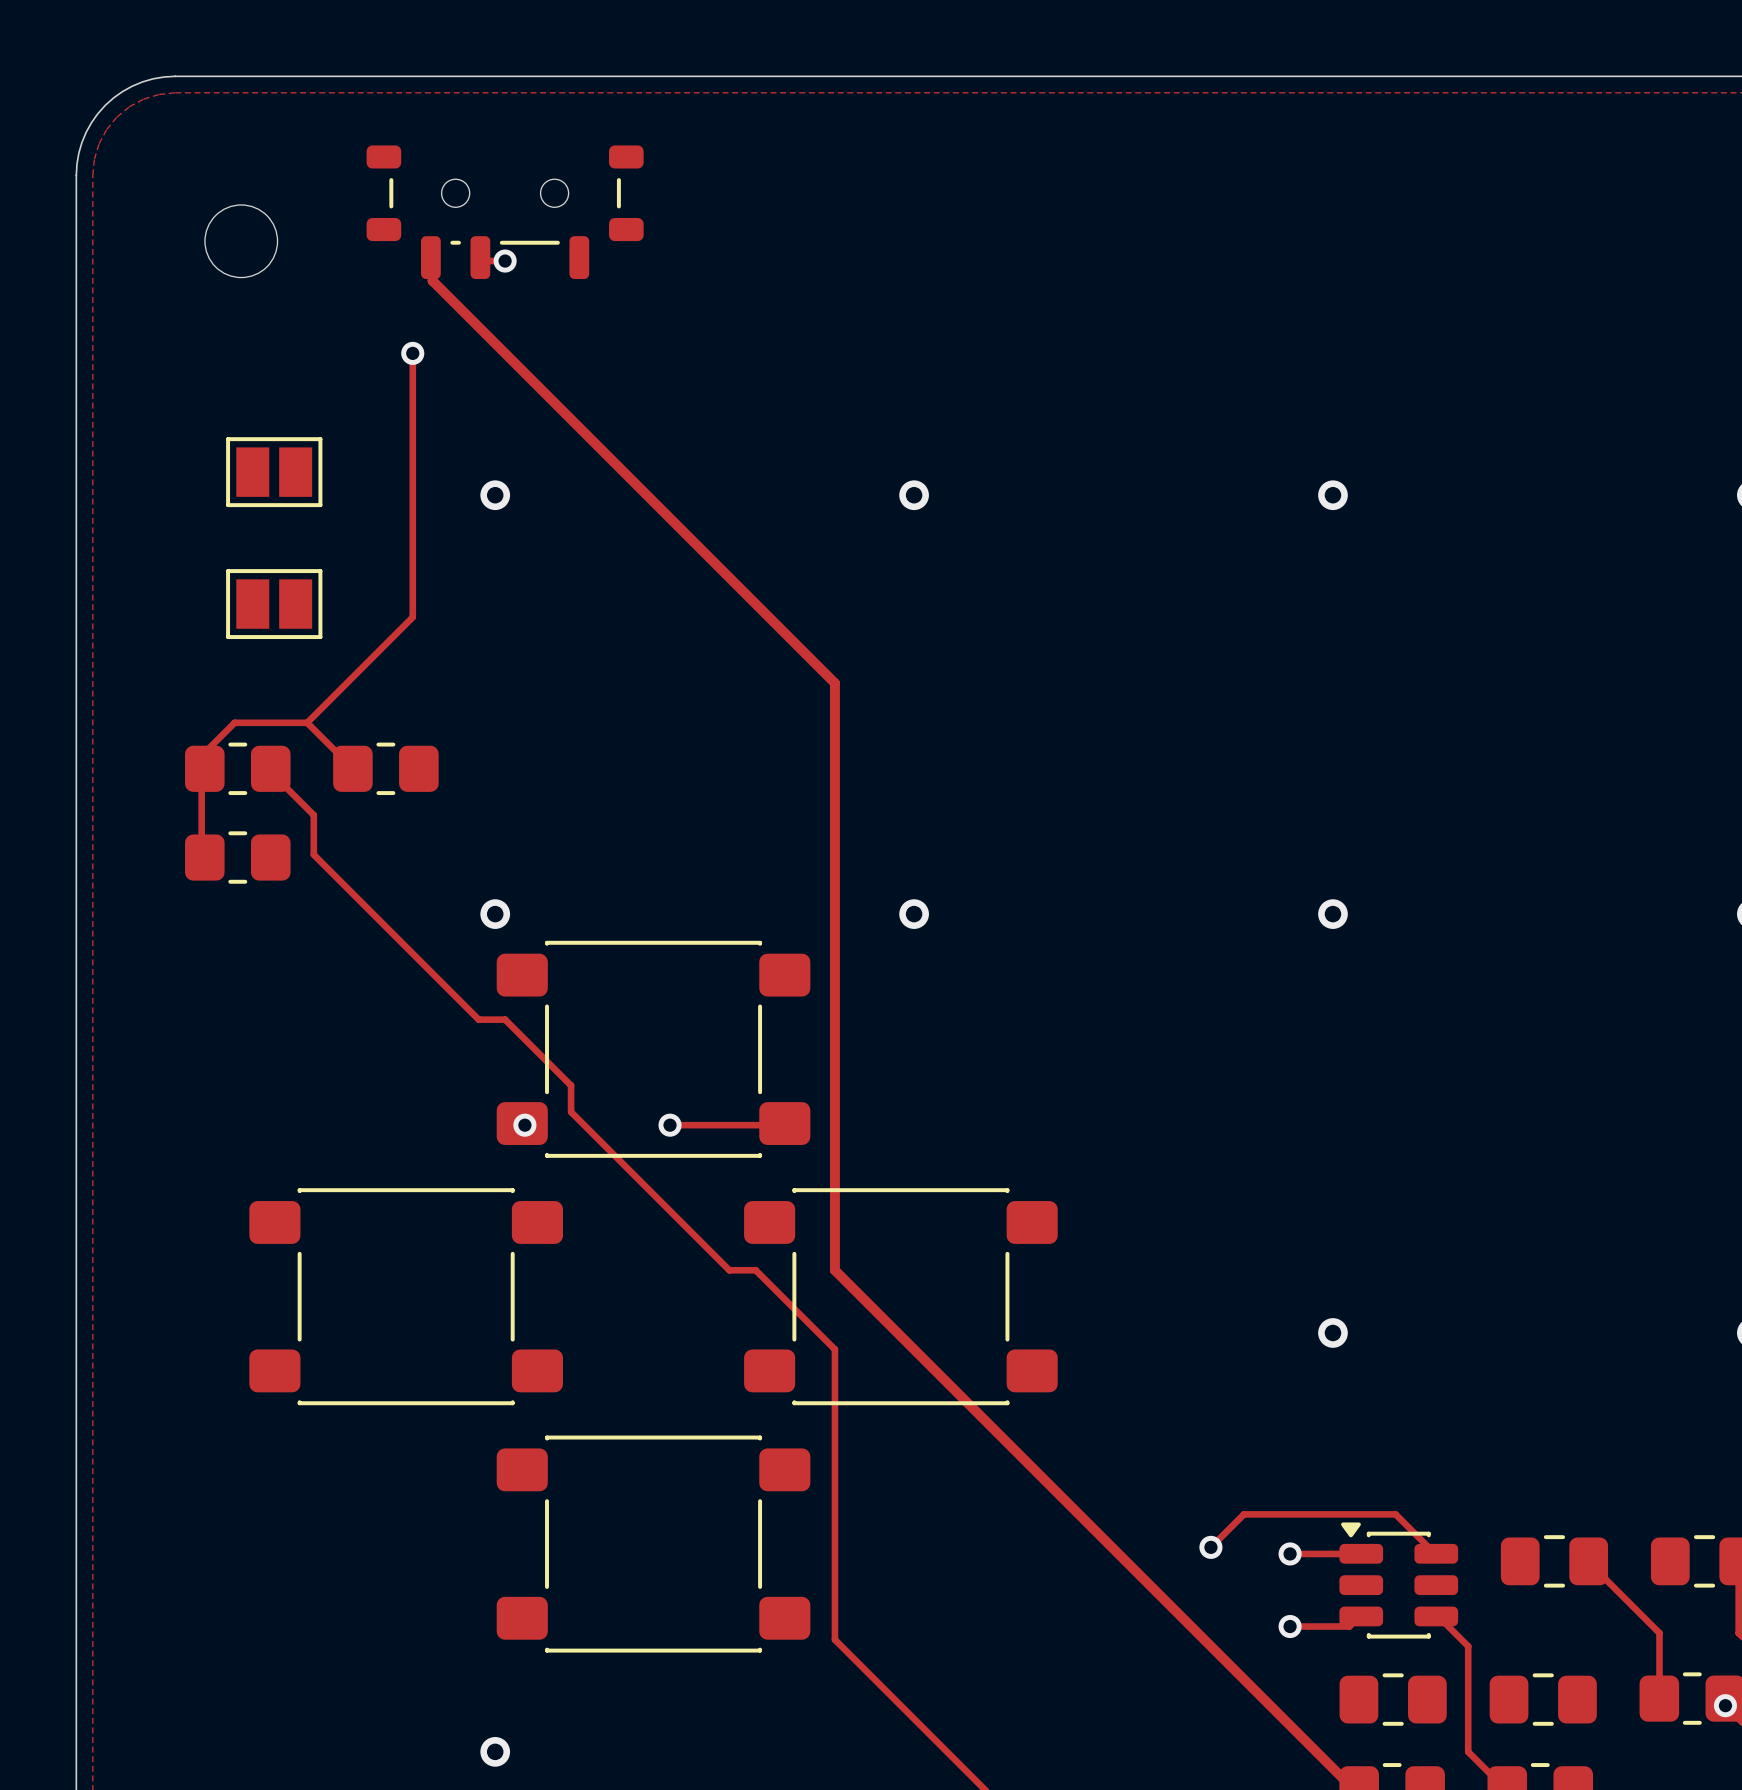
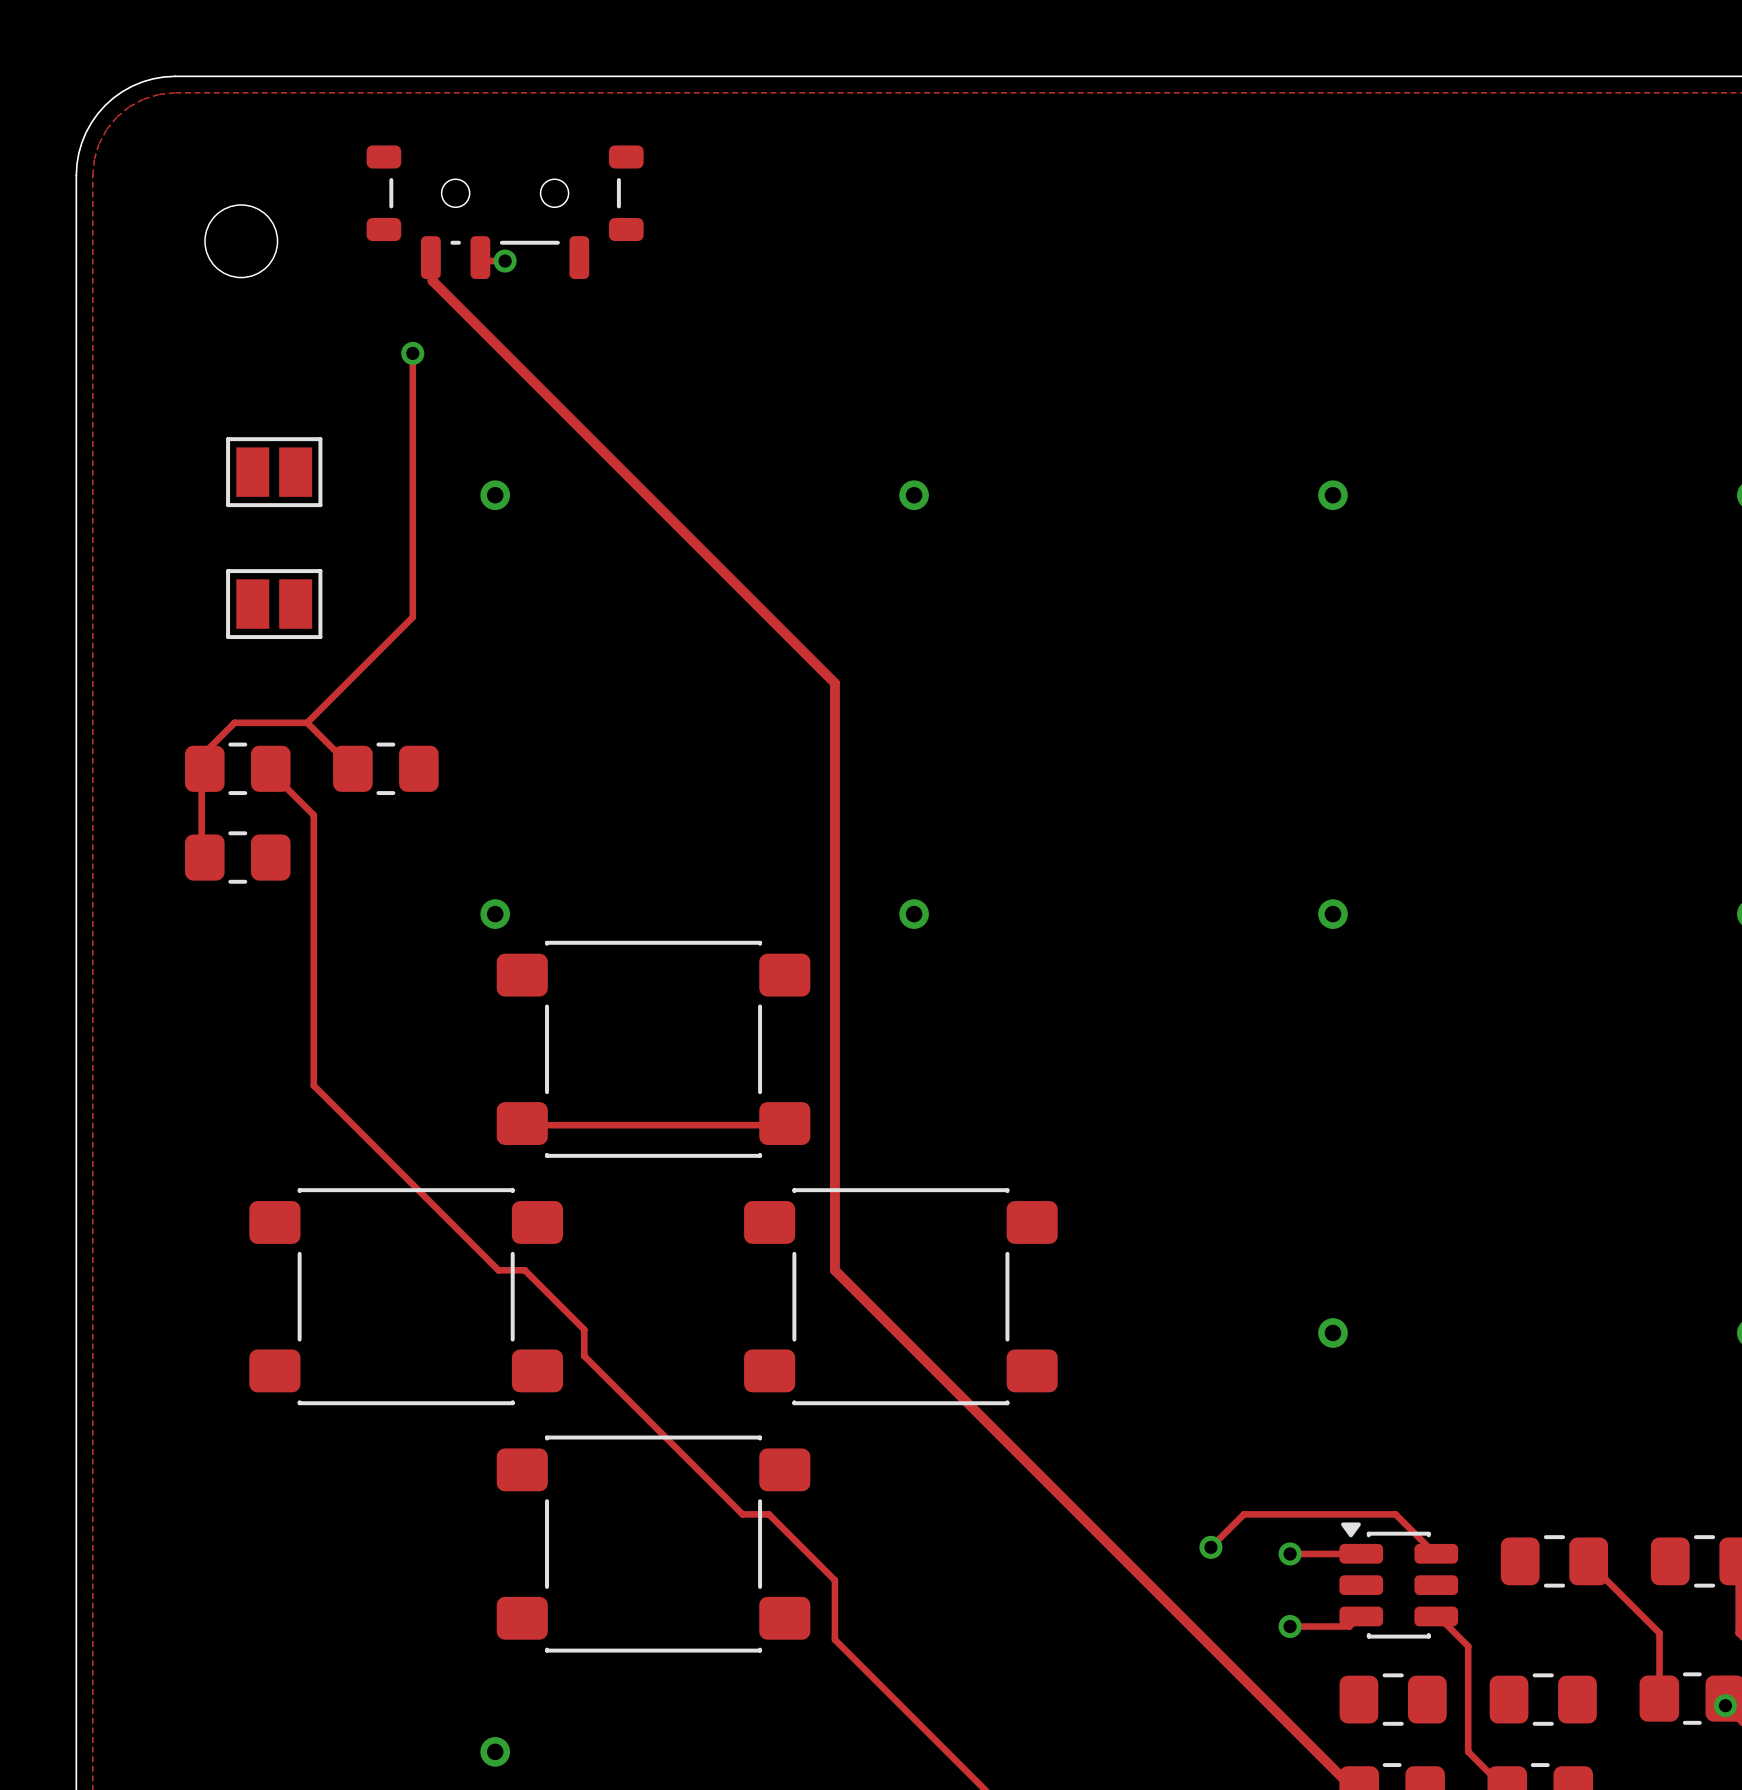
track: (313, 854) (478, 1019) (505, 1019) (571, 1085) (571, 1111) (729, 1270) (755, 1270) (834, 1349) (834, 1580) -> (313, 854) (313, 1085) (498, 1270) (524, 1270) (584, 1329) (584, 1356) (742, 1514) (768, 1514) (834, 1580)
track: none -> (524, 1125) (670, 1125)
via: (524, 1125) -> none
via: (670, 1125) -> none

